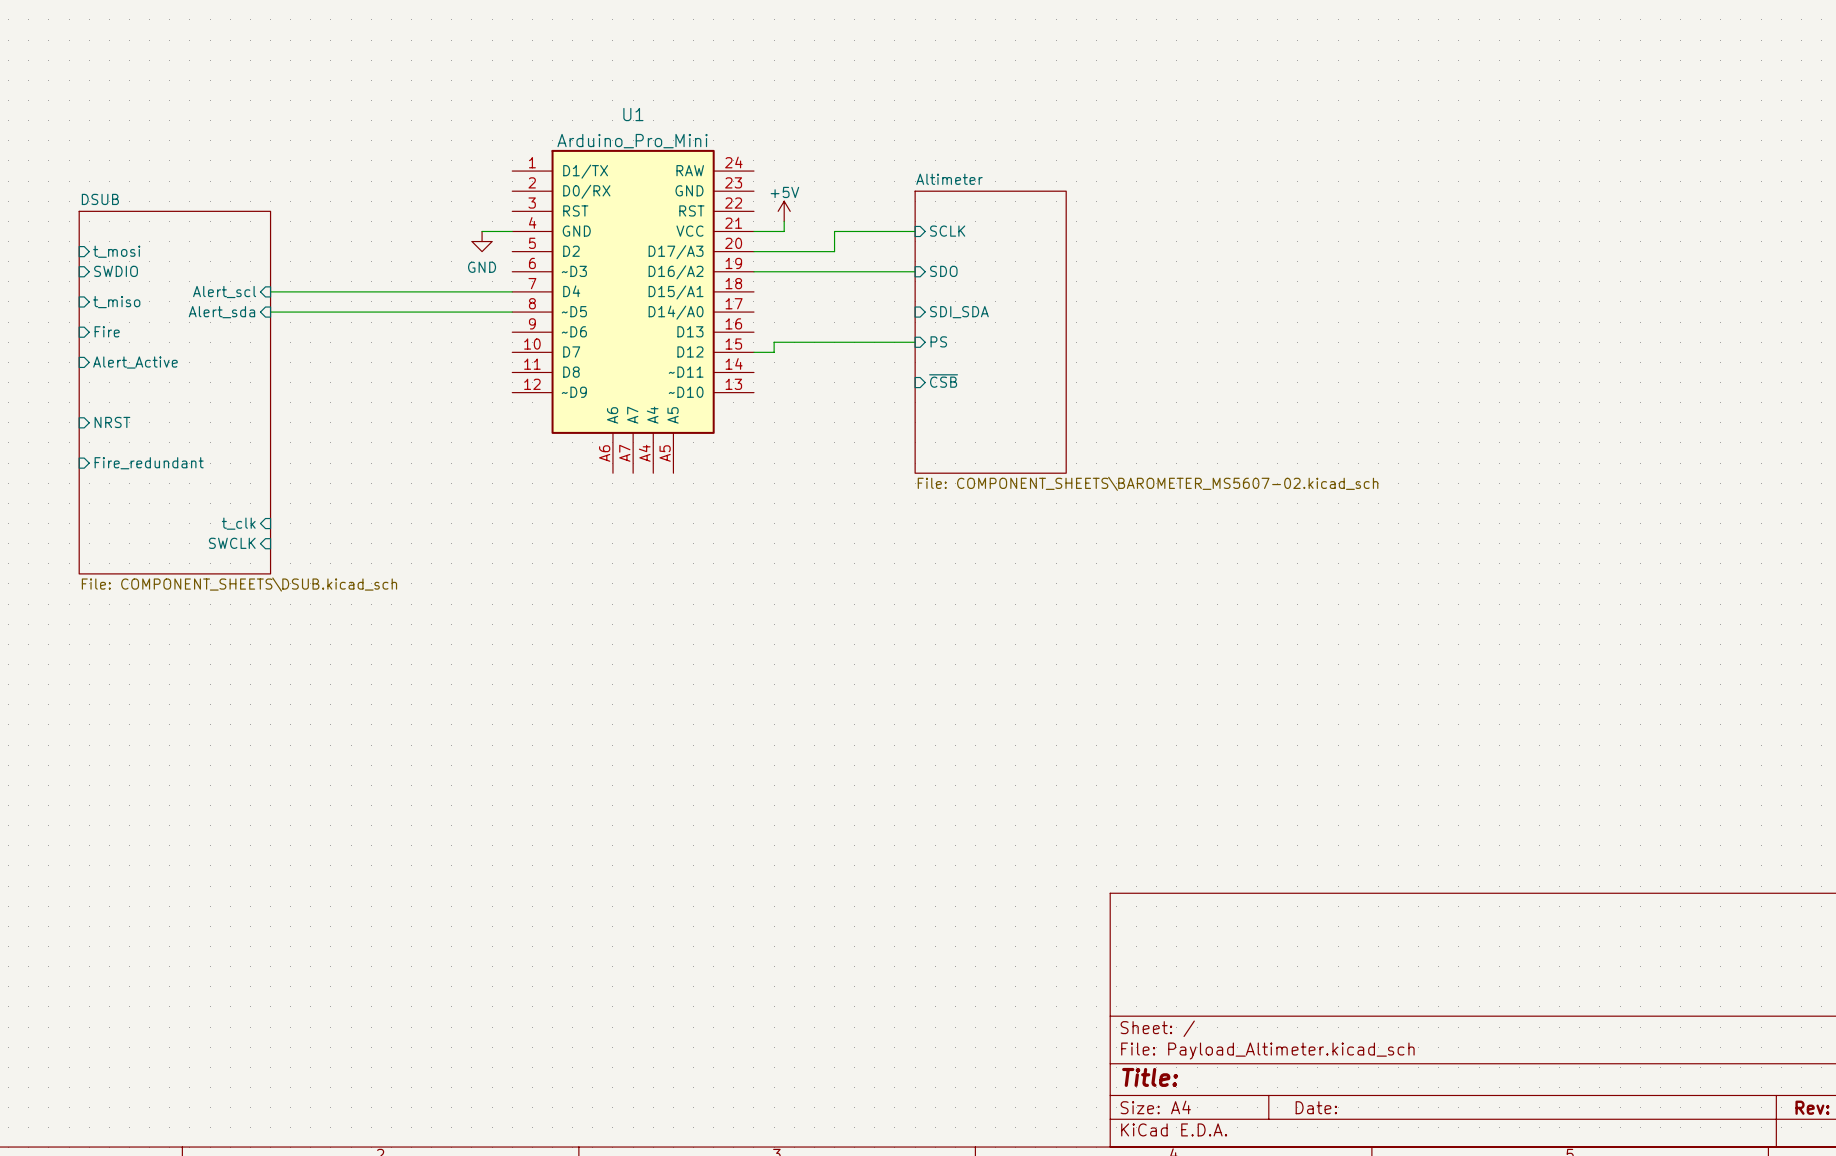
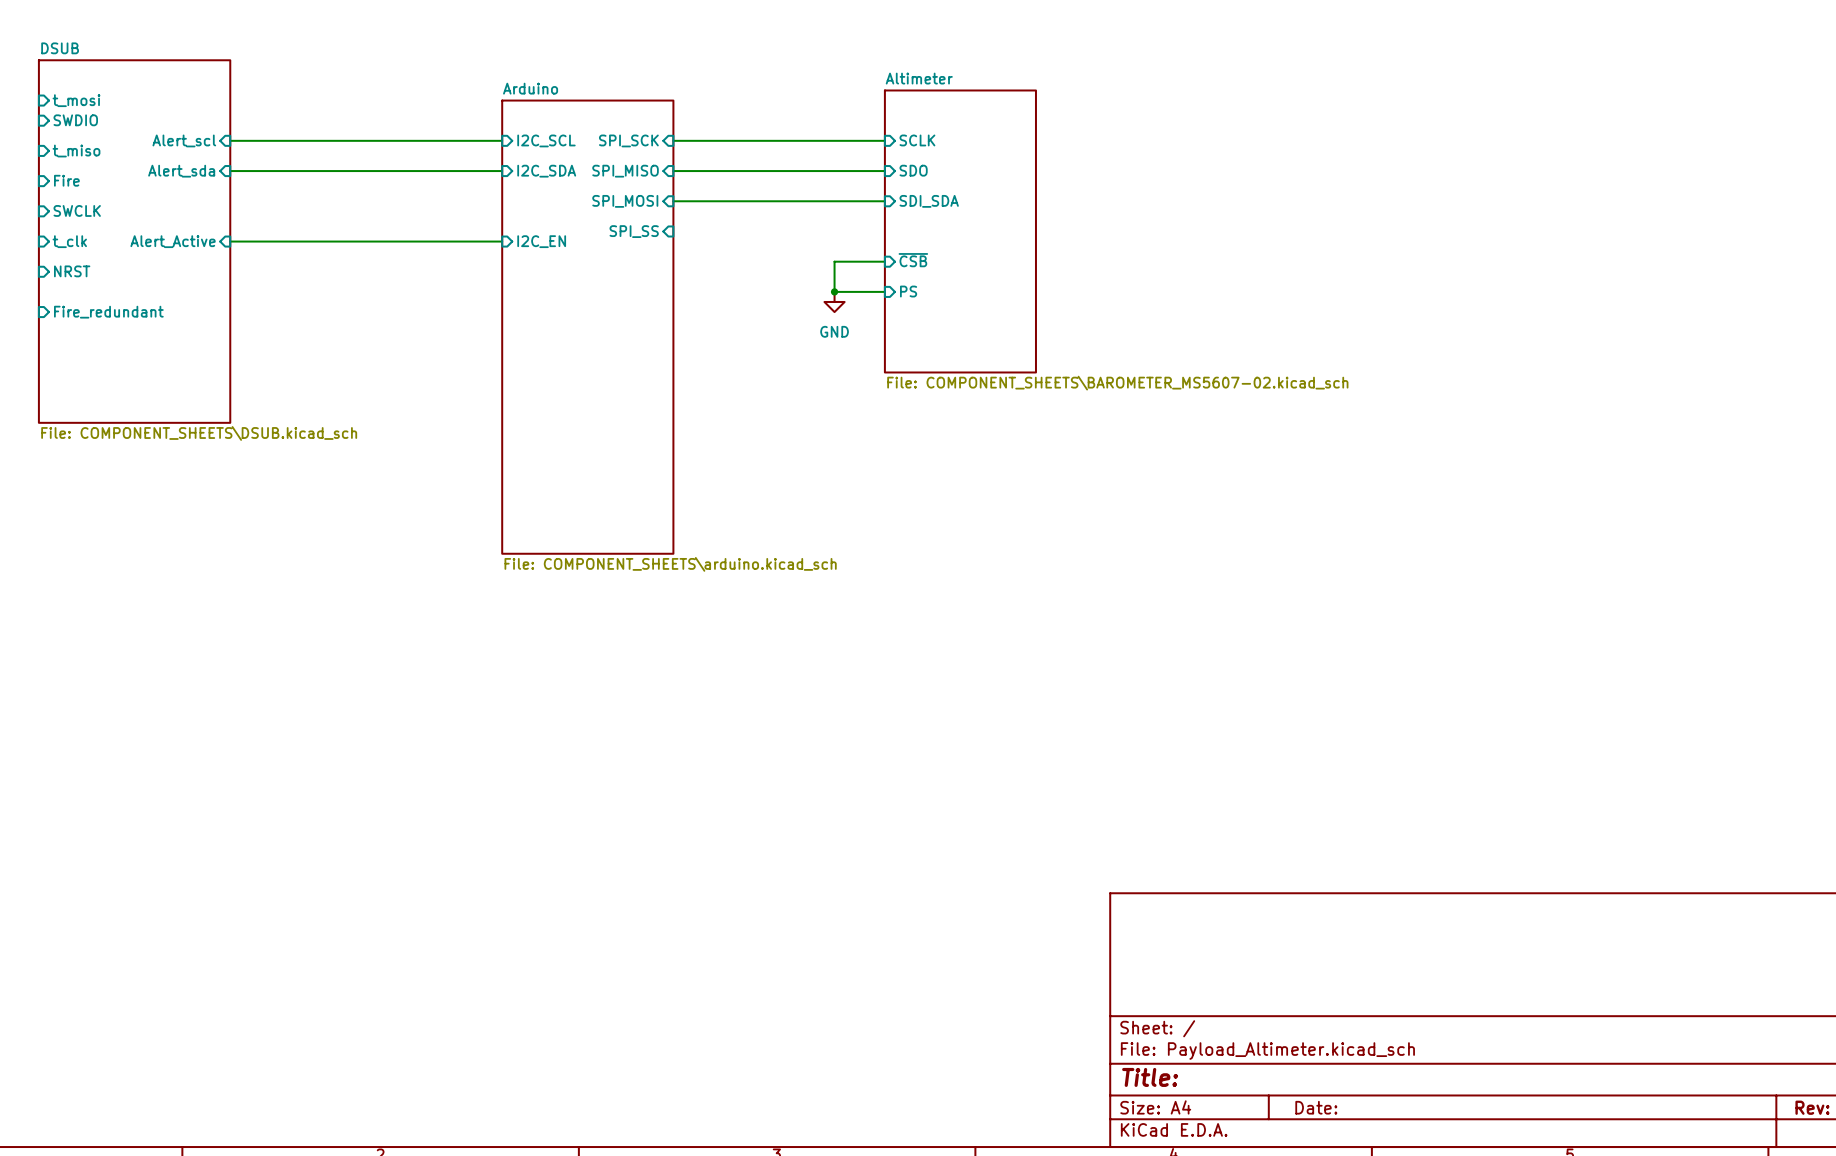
wire: none -> (230, 140) (502, 140)
sheet pin: none -> I2C_SCL (546, 140)
sheet pin: none -> SPI_SCK (628, 140)
wire: none -> (673, 140) (884, 140)
wire: none -> (230, 171) (502, 171)
sheet pin: none -> I2C_SDA (546, 171)
sheet pin: none -> SPI_MISO (625, 171)
wire: none -> (673, 171) (884, 171)
sheet pin: none -> SPI_MOSI (625, 201)
wire: none -> (673, 201) (884, 201)
sheet pin: none -> SWCLK (77, 210)
power symbol: +5V (784, 211) -> none
wire: (784, 221) (784, 231) (753, 231) -> none
wire: (482, 231) (512, 231) -> none
sheet pin: none -> SPI_SS (634, 231)
wire: (915, 231) (834, 231) (834, 251) (753, 251) -> none
sheet pin position: SCLK (947, 231) -> SCLK (917, 140)
sheet pin: none -> t_clk (69, 241)
wire: none -> (230, 241) (502, 241)
power symbol: GND (482, 241) -> none
sheet pin: none -> I2C_EN (541, 241)
sheet pin position: t_mosi (116, 251) -> t_mosi (76, 100)
wire: none -> (884, 261) (834, 261) (834, 291) (884, 291)
sheet pin position: SWDIO (116, 271) -> SWDIO (75, 120)
wire: (753, 271) (915, 271) -> none
sheet pin position: SDO (943, 271) -> SDO (913, 170)
wire: (270, 291) (512, 291) -> none
junction: none -> (834, 291)
sheet pin position: Alert_scl (224, 292) -> Alert_scl (184, 140)
power symbol: none -> GND (834, 301)
sheet pin position: t_miso (116, 302) -> t_miso (76, 151)
U1: Arduino_Pro_Mini (633, 311) -> none
sheet pin position: Alert_sda (221, 312) -> Alert_sda (181, 171)
wire: (270, 312) (512, 312) -> none
sheet pin position: SDI_SDA (959, 312) -> SDI_SDA (929, 201)
sheet Arduino: none -> File: COMPONENT_SHEETS\arduino.kicad_sch (587, 327)
sheet pin position: Fire (107, 331) -> Fire (66, 180)
sheet Altimeter position: (990, 332) -> (960, 231)
sheet pin position: PS (938, 341) -> PS (908, 291)
wire: (915, 342) (774, 342) (774, 352) (753, 352) -> none
sheet pin rotation: 0° (135, 362) -> 180° (173, 241)
sheet pin position: Alert_Active (135, 362) -> Alert_Active (173, 241)
sheet pin position: ~{CSB} (943, 381) -> ~{CSB} (913, 260)
sheet DSUB position: (174, 392) -> (134, 241)
sheet pin position: NRST (112, 422) -> NRST (72, 271)
sheet pin position: Fire_redundant (149, 463) -> Fire_redundant (108, 312)
sheet pin: t_clk (238, 523) -> none
sheet pin: SWCLK (232, 543) -> none

